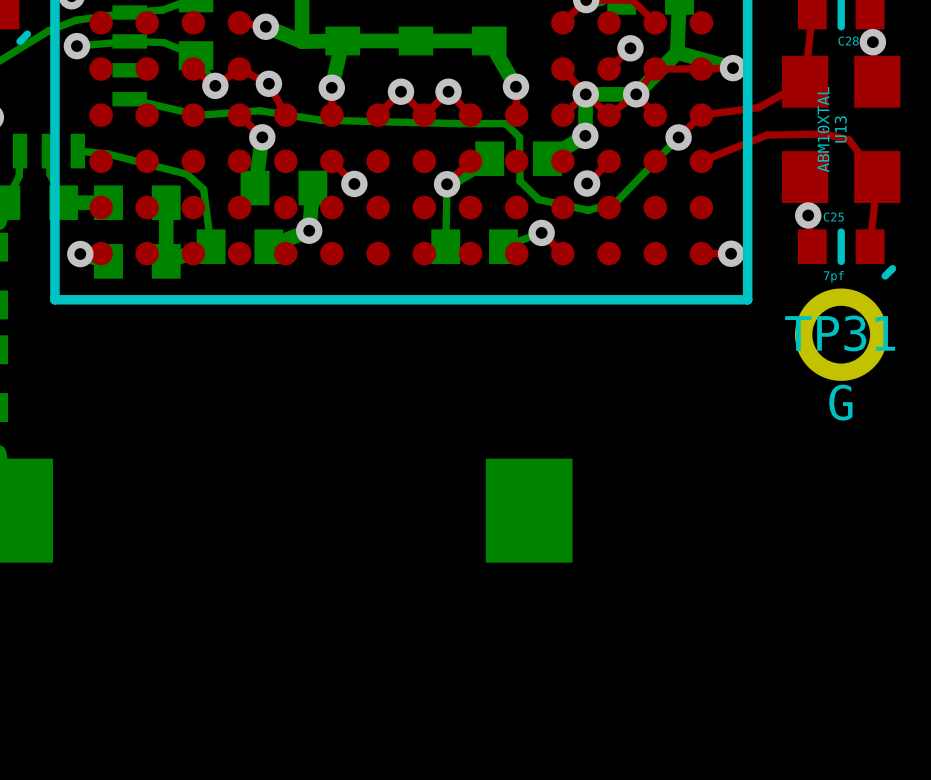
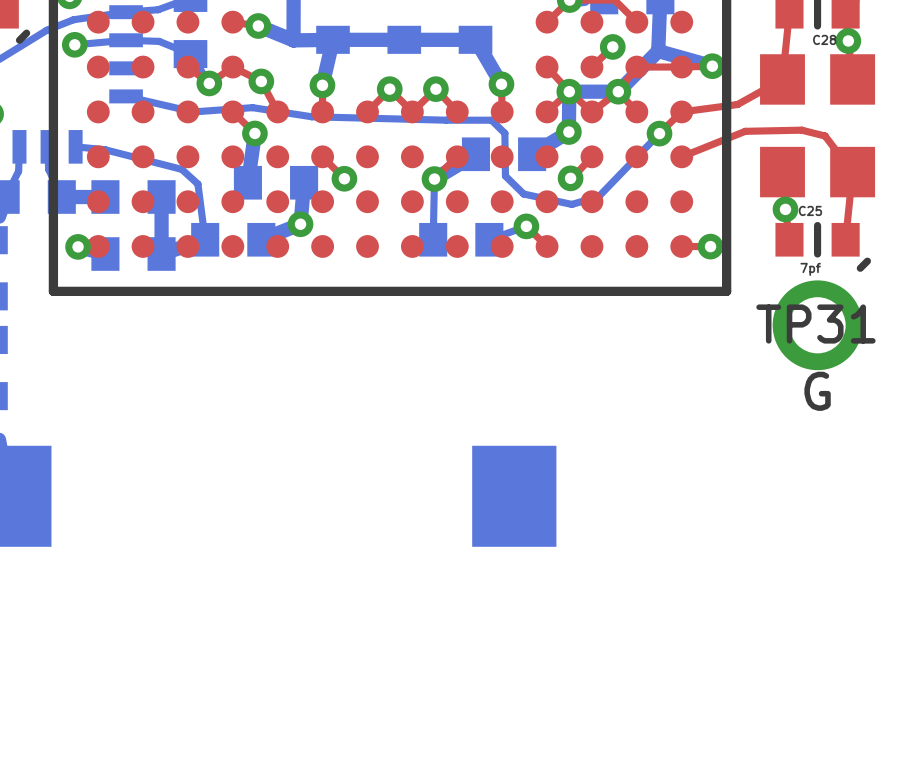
U13 value: ABM10XTAL (823, 129) -> none
U13 name: U13 (840, 129) -> none

